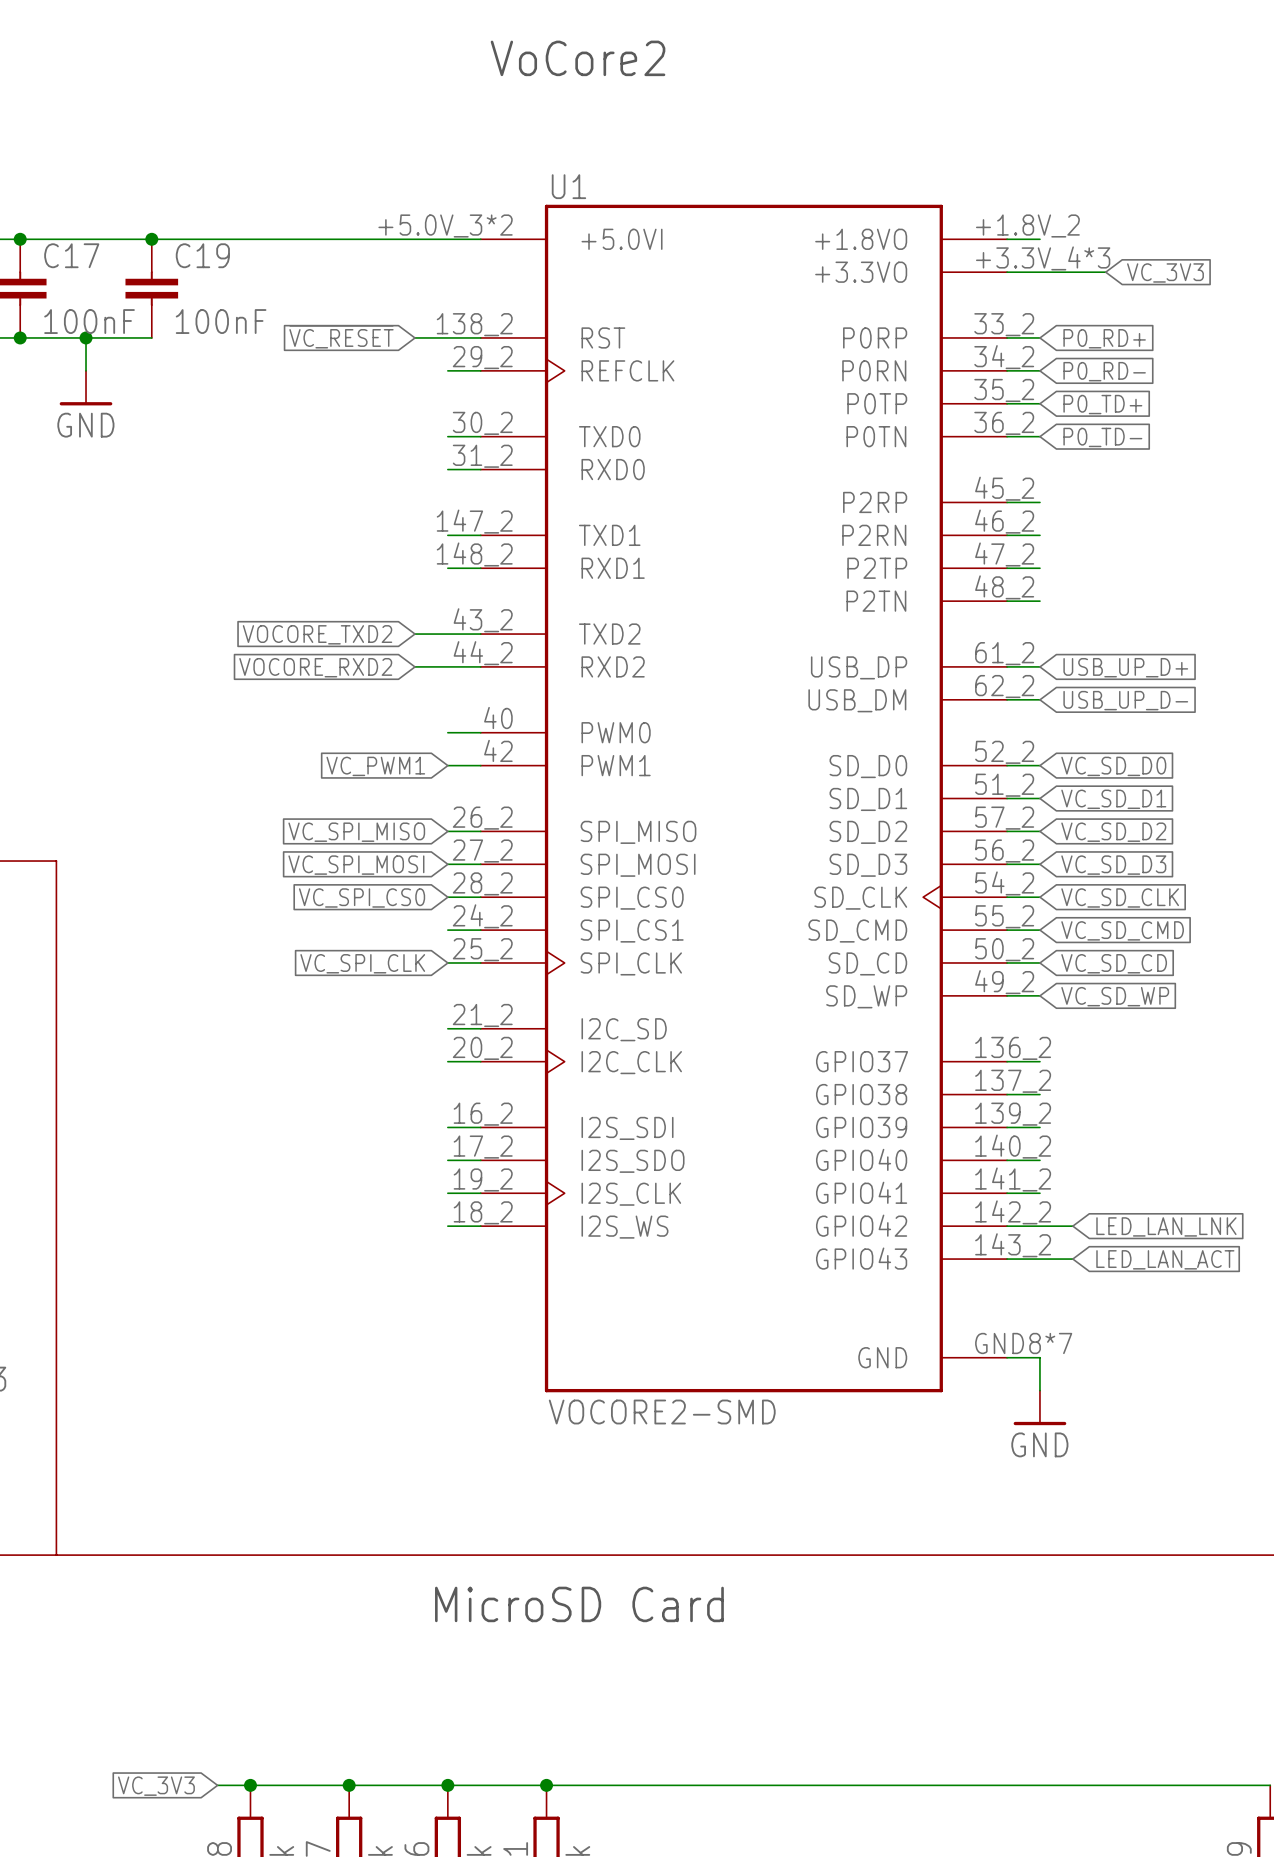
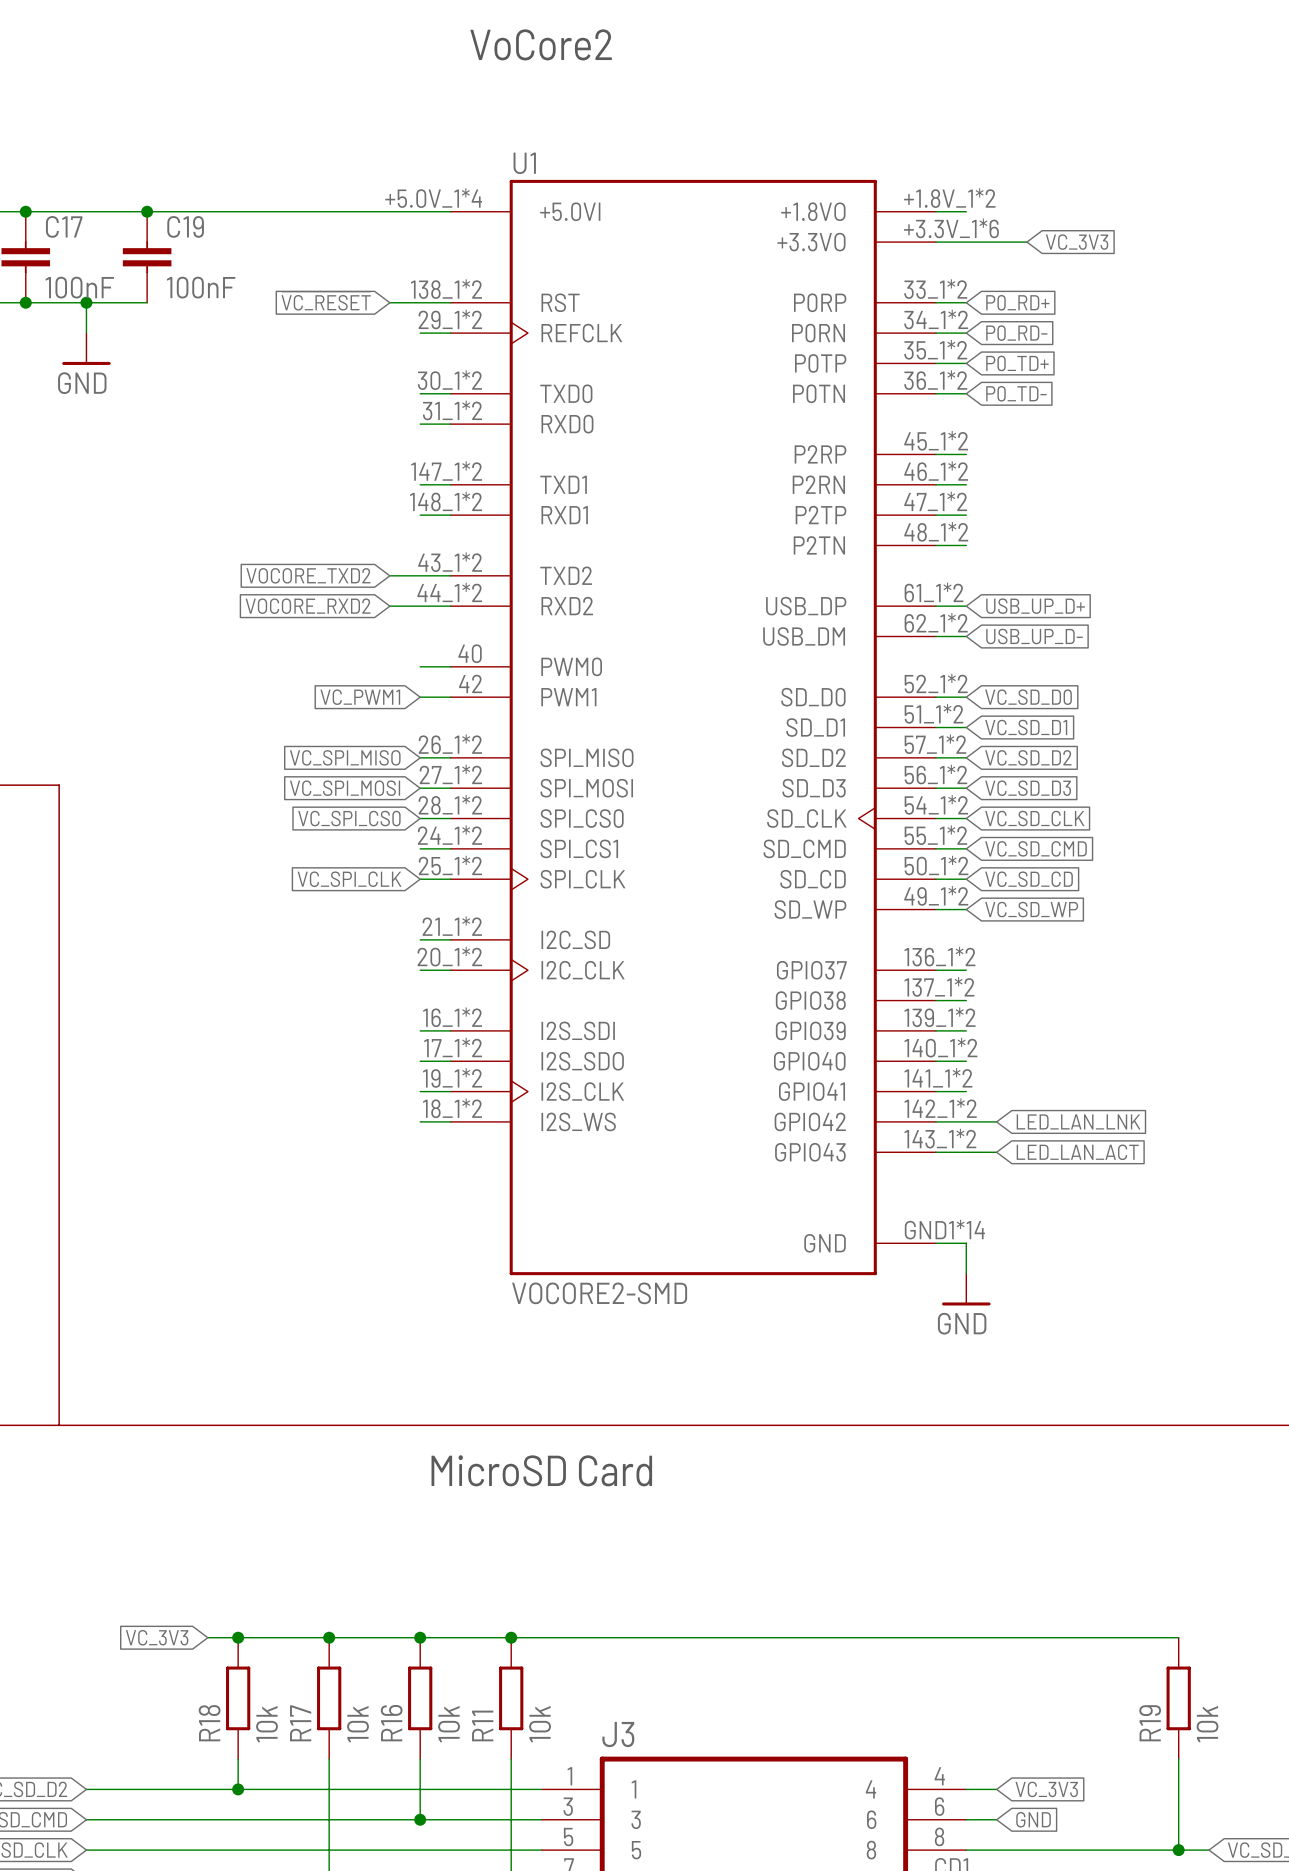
U1 symbol: [480, 204, 1008, 1393] -> [450, 179, 936, 1276]

